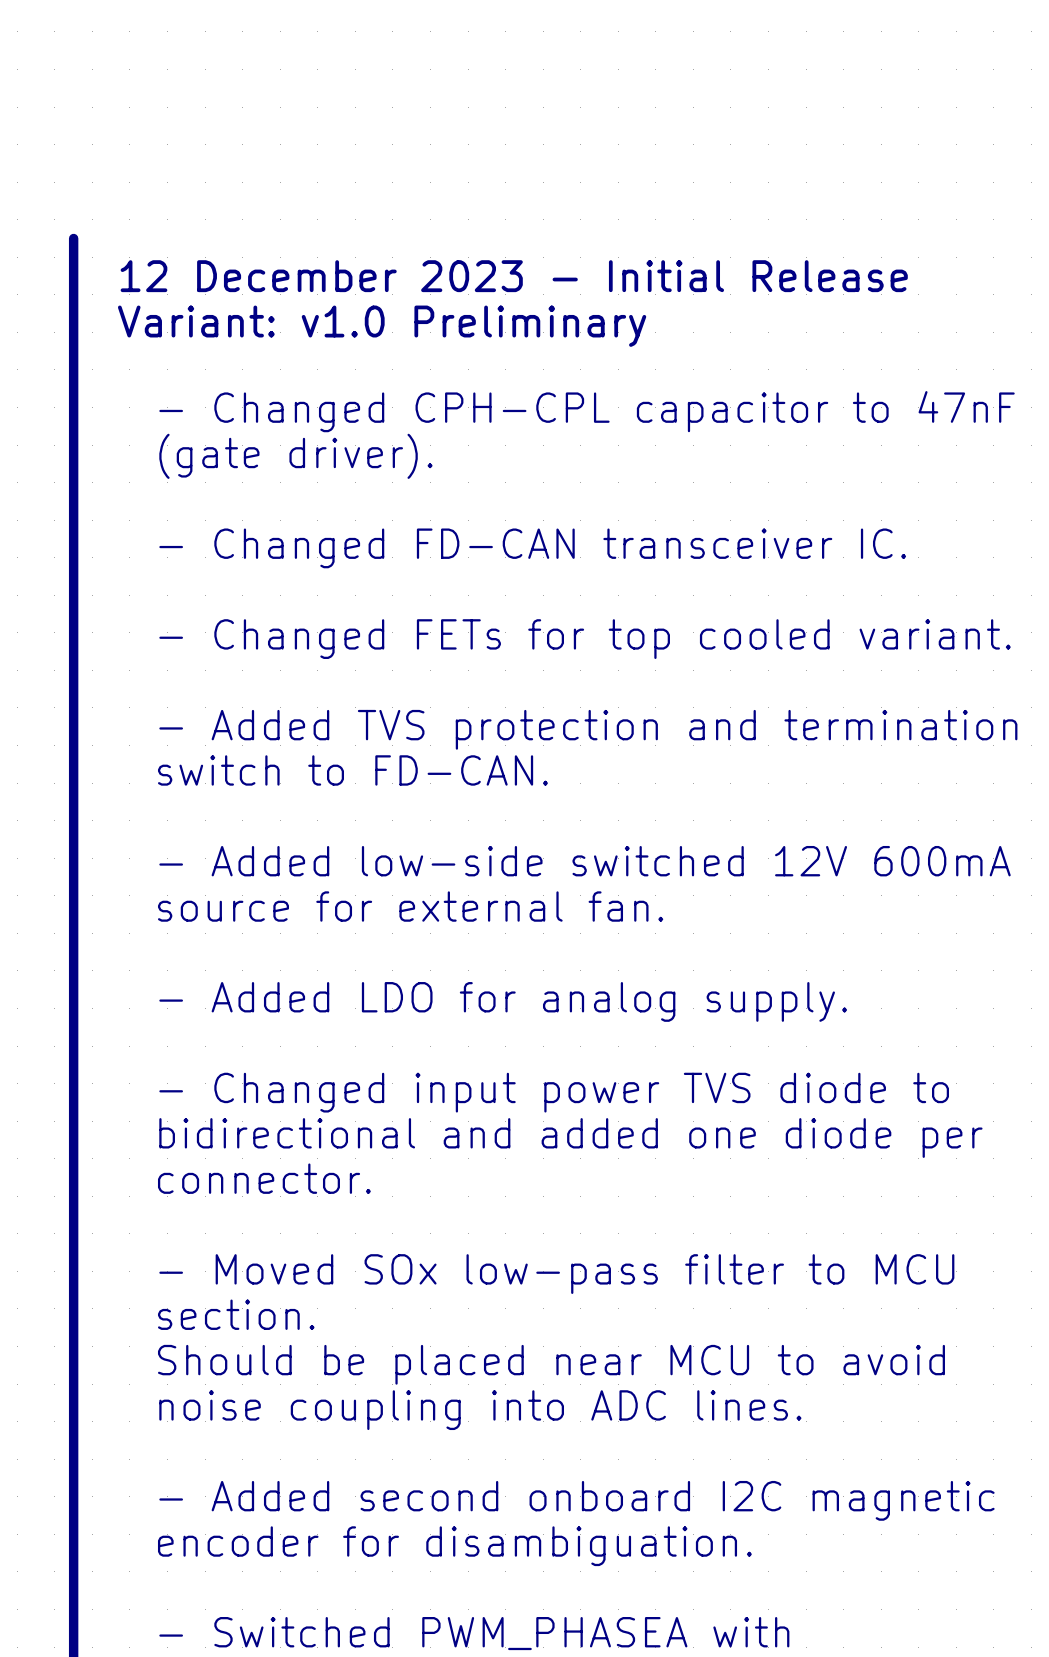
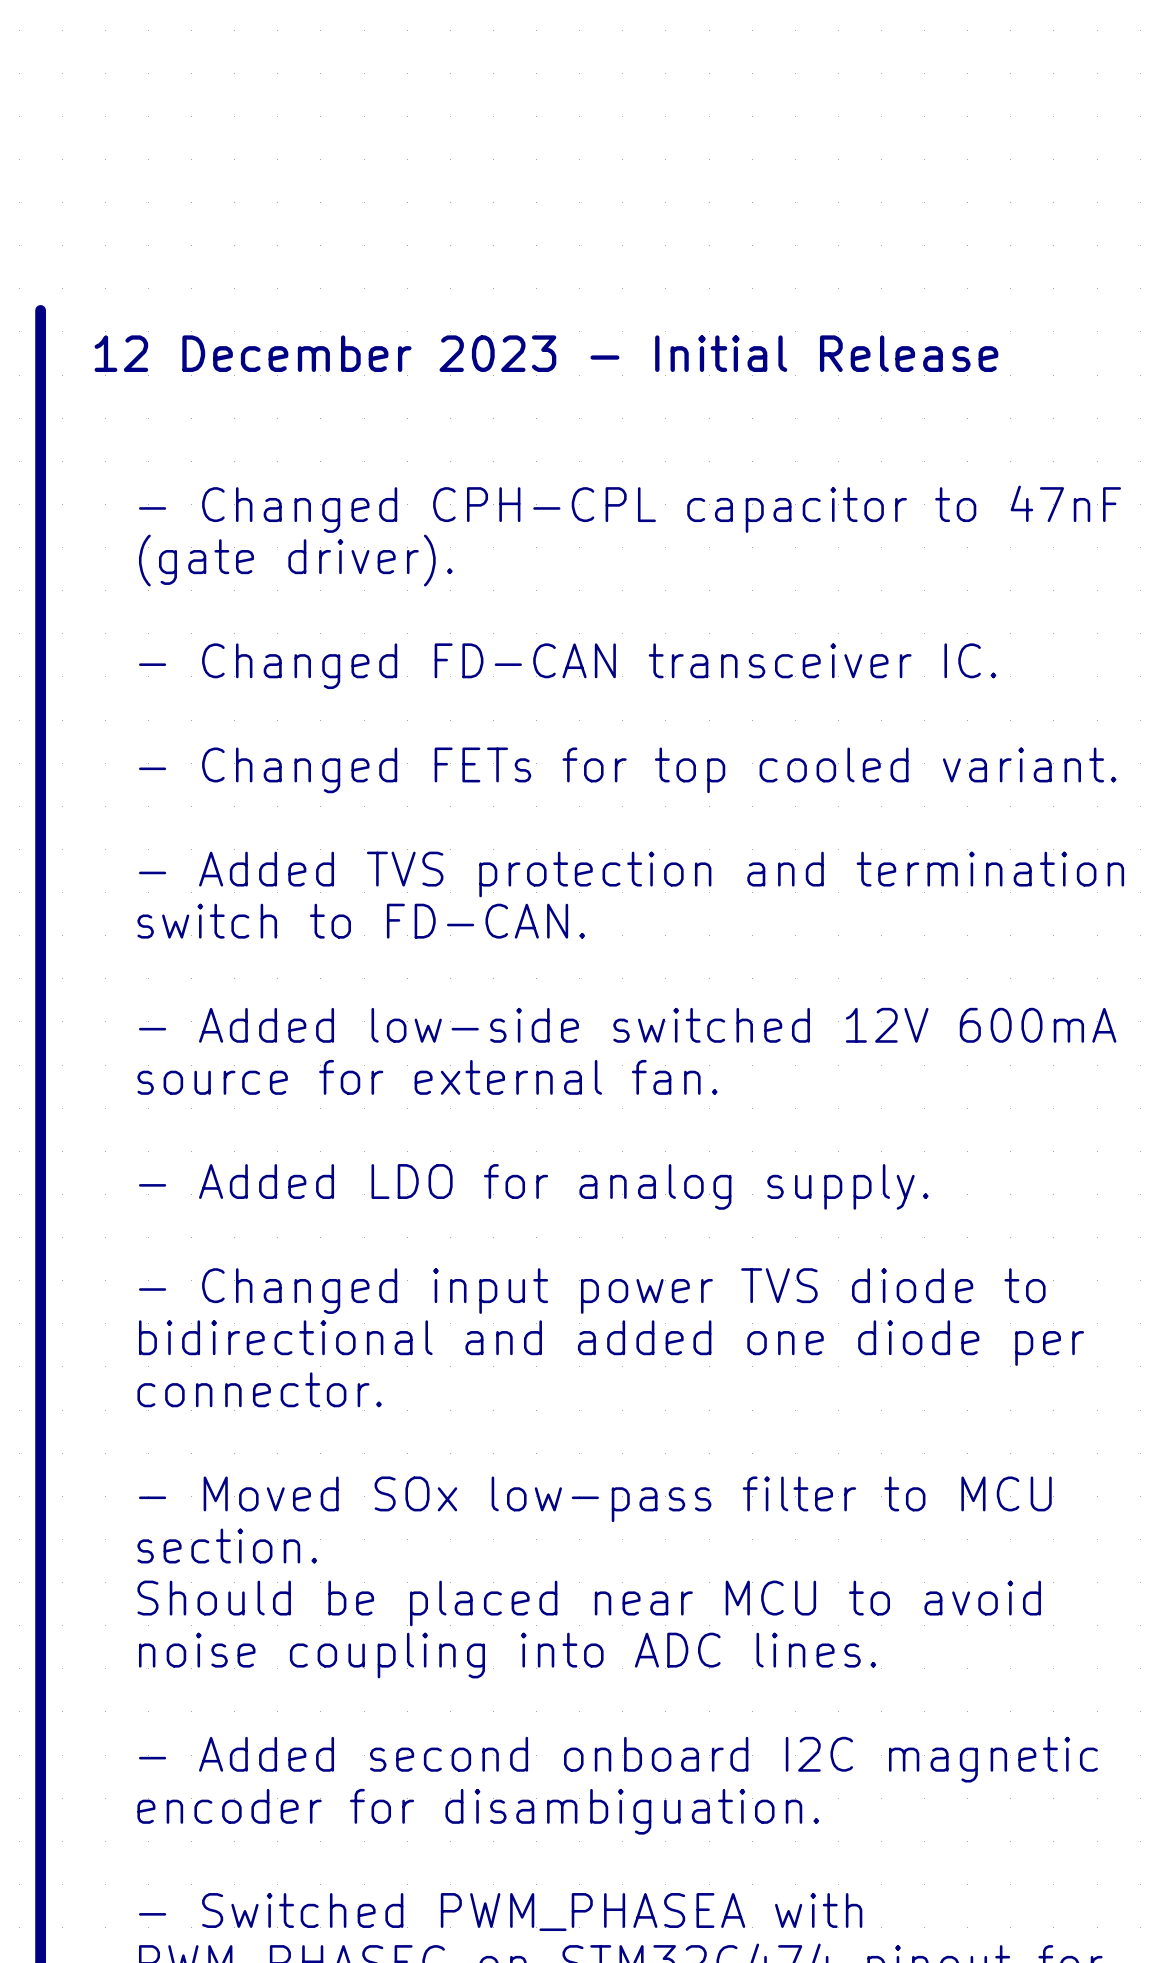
text: Variant: v1.0 Preliminary (382, 326) -> none

